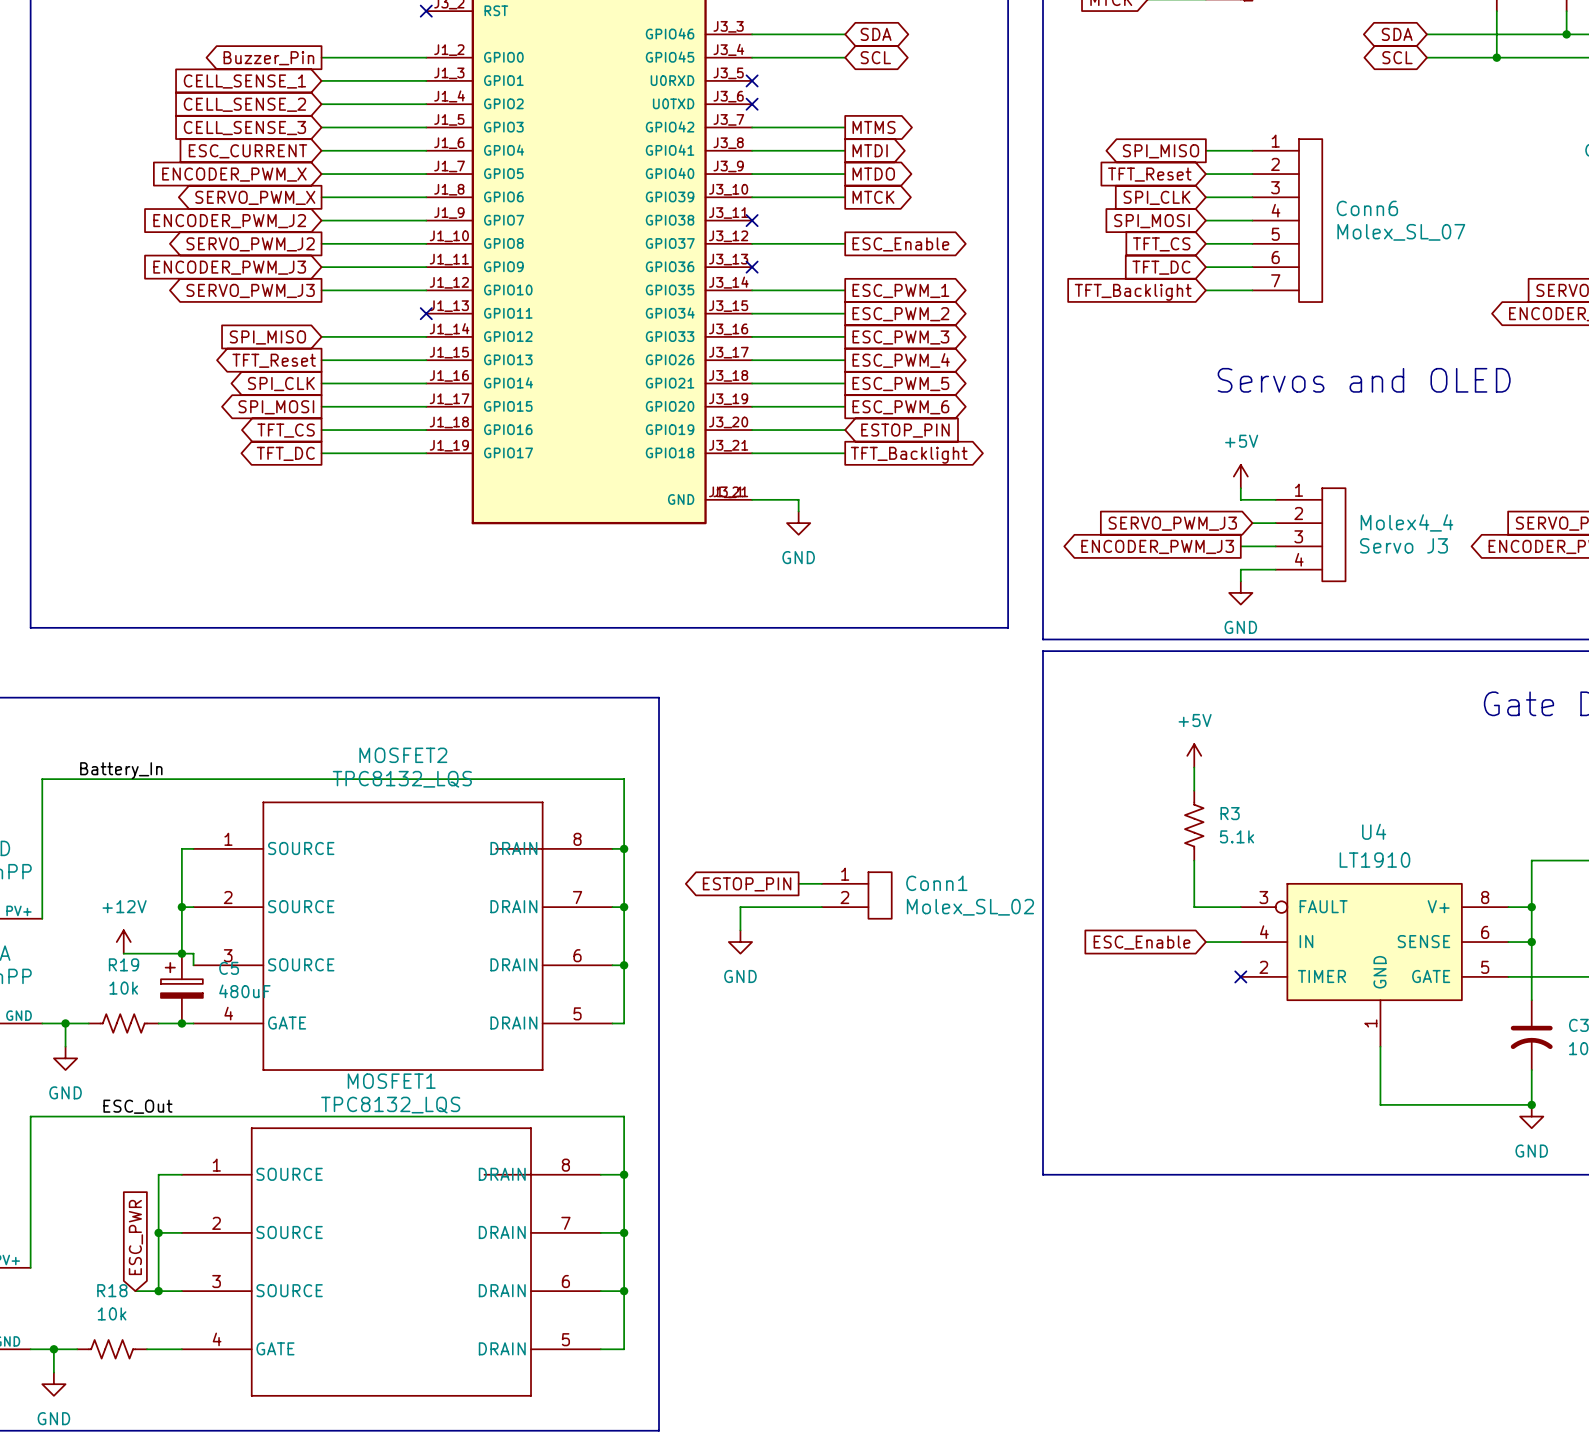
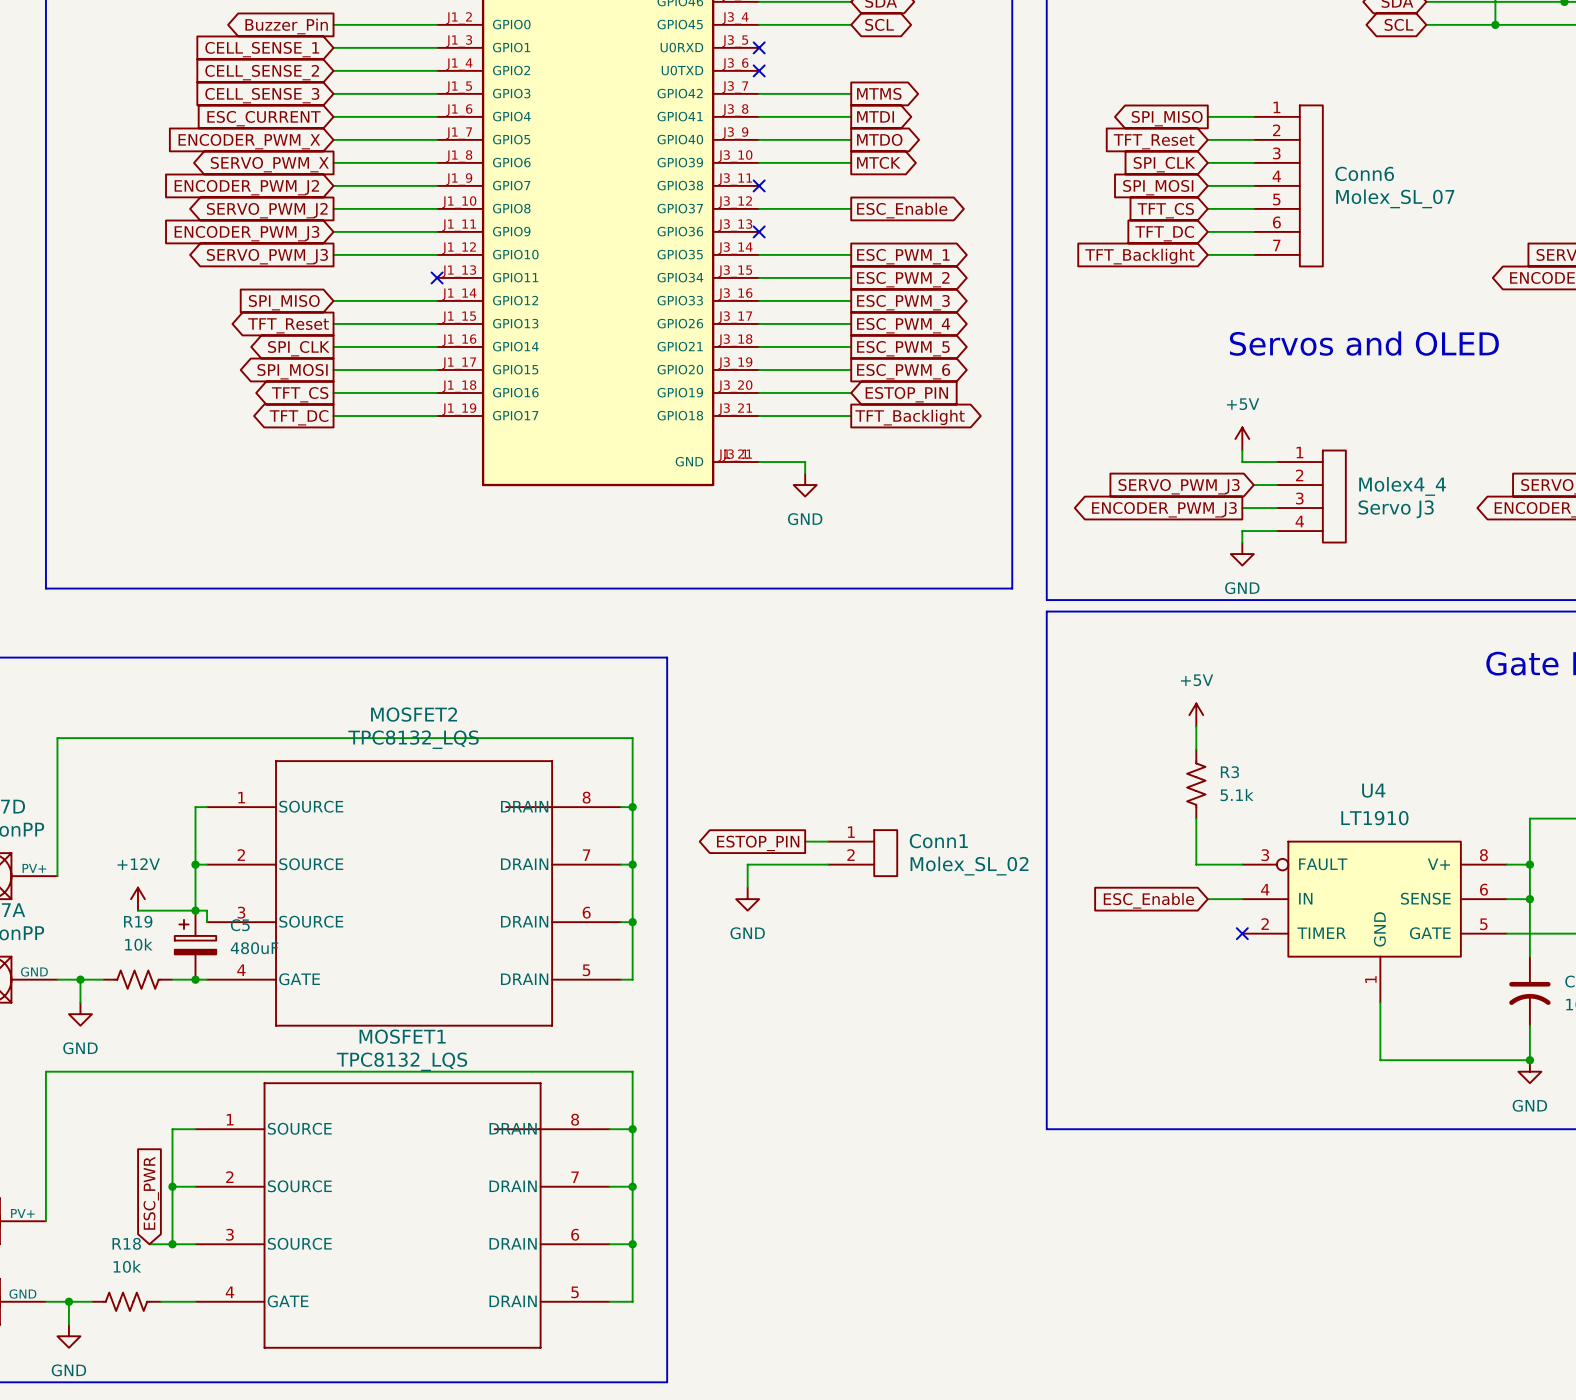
label: Battery_In (121, 770) -> none
label: ESC_Out (137, 1106) -> none

